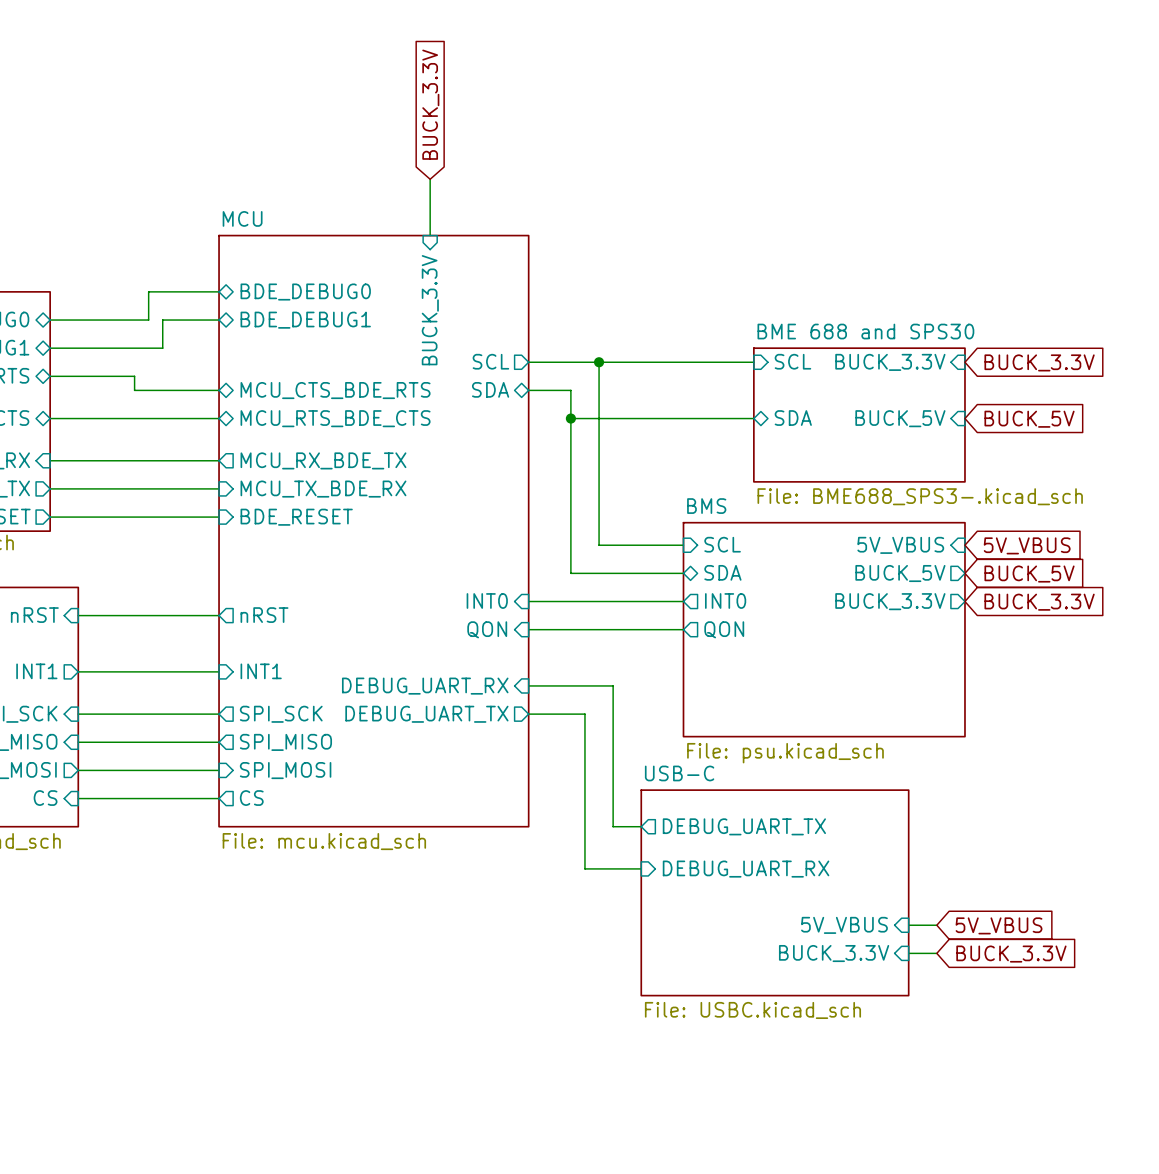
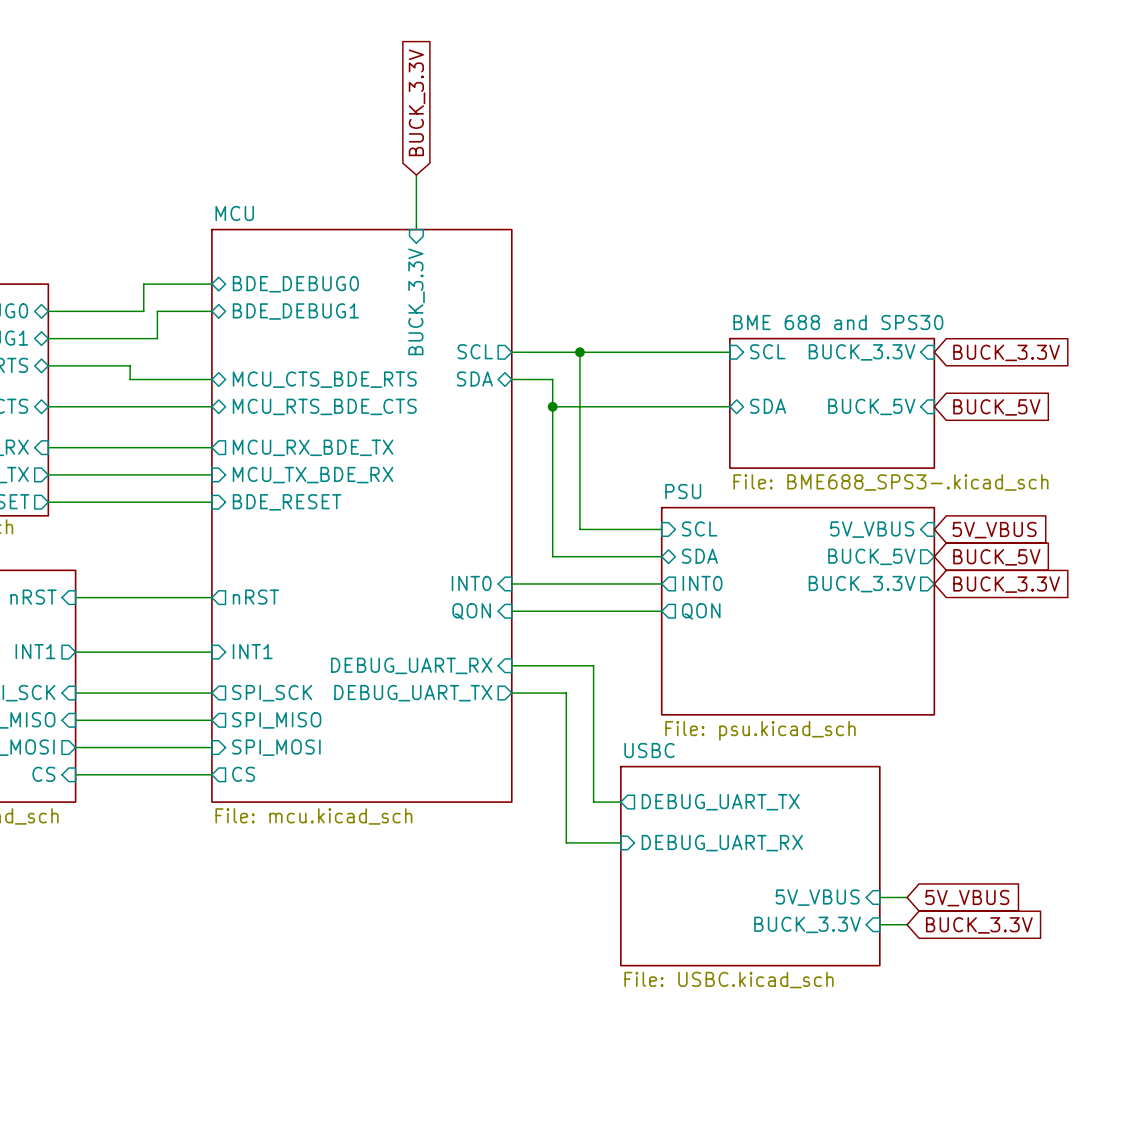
sheet BMS name: BMS (706, 506) -> PSU (683, 491)
sheet USB-C name: USB-C (679, 773) -> USBC (649, 750)

